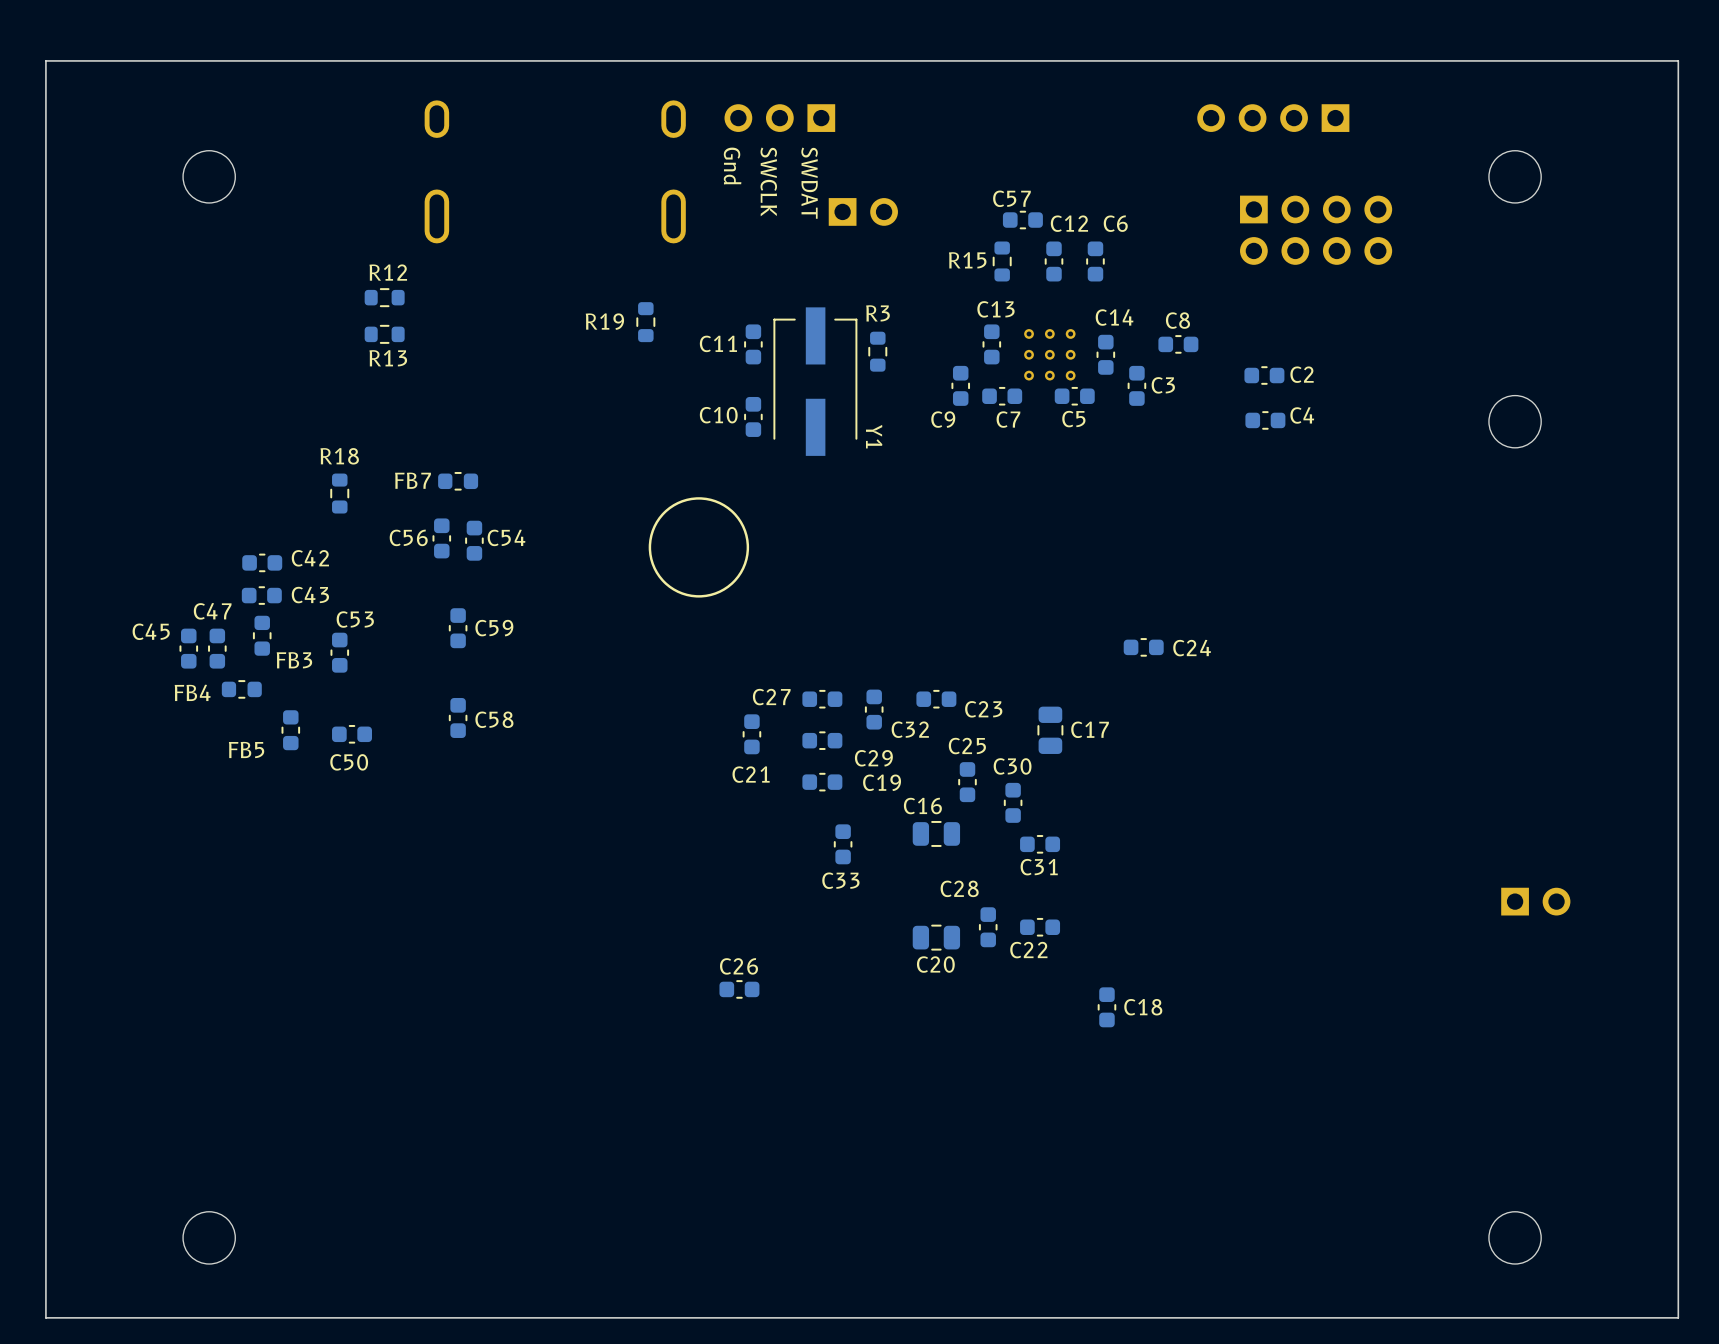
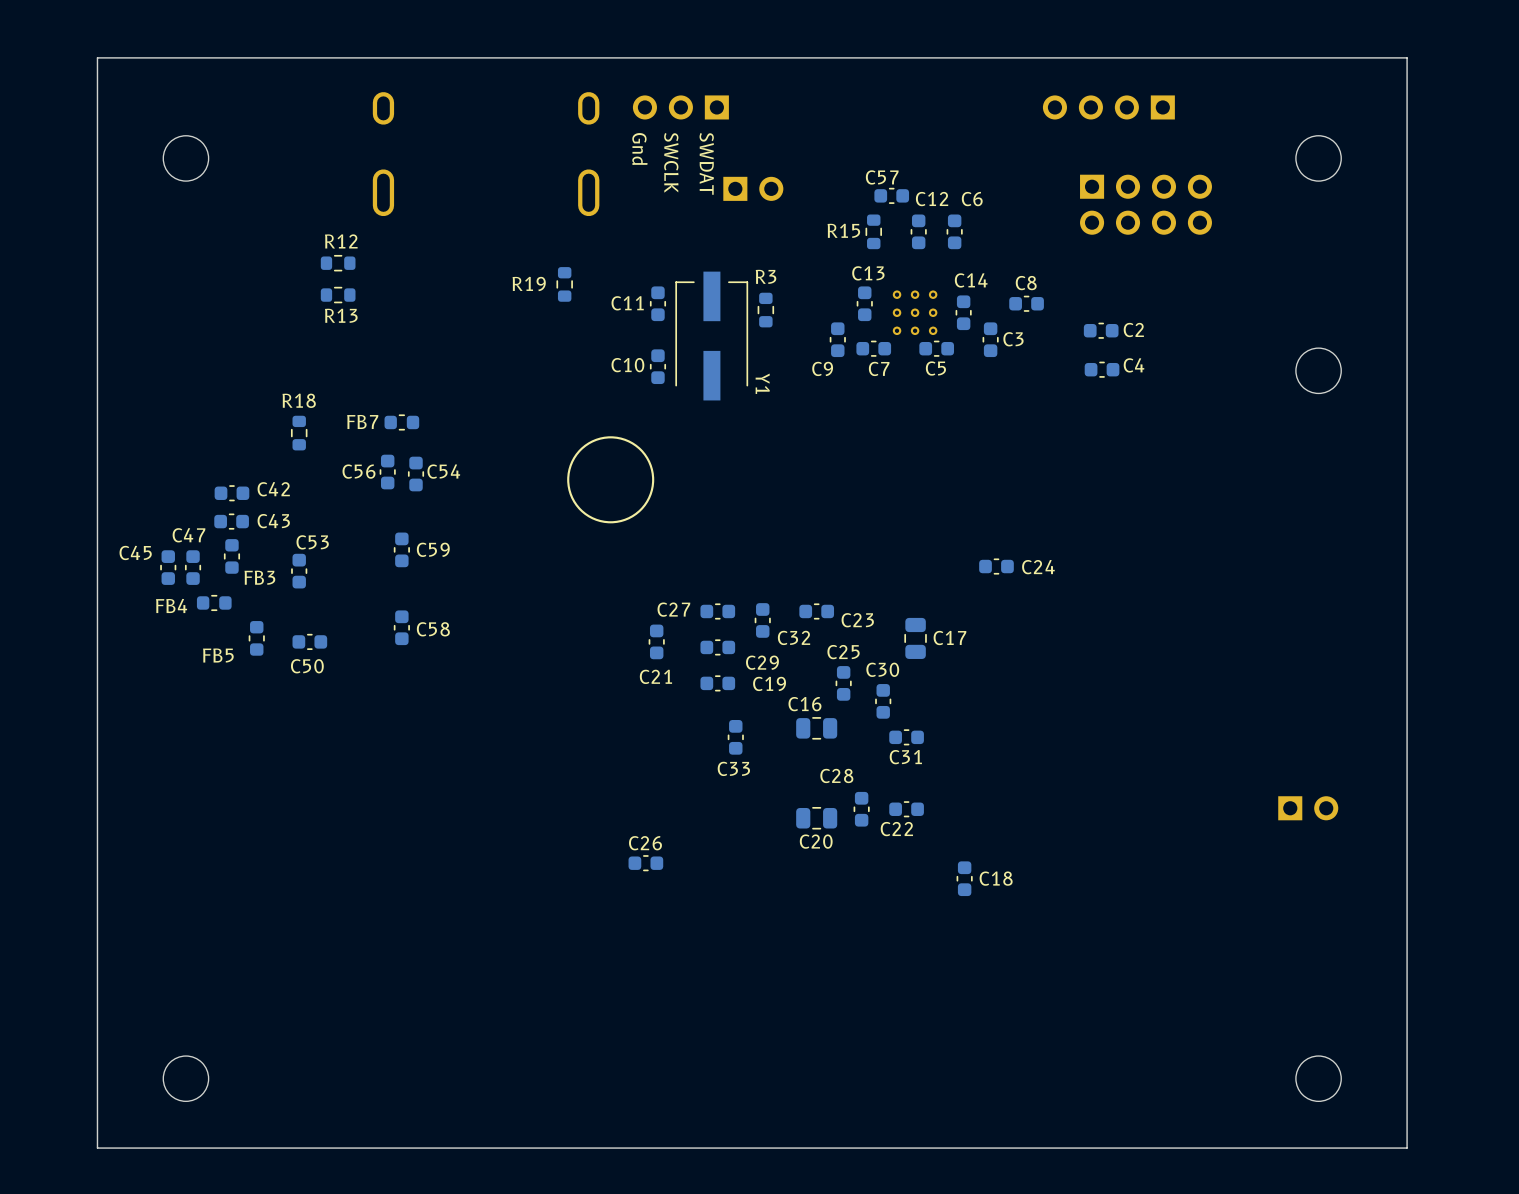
board edge: (107, 60) (45, 60) (45, 1317) (107, 1317) -> (97, 57) (97, 1148)
board edge: (1617, 60) (1678, 60) (1678, 1317) (1617, 1317) -> (1407, 57) (1407, 1148)
part position: (1535, 901) -> (1308, 808)

